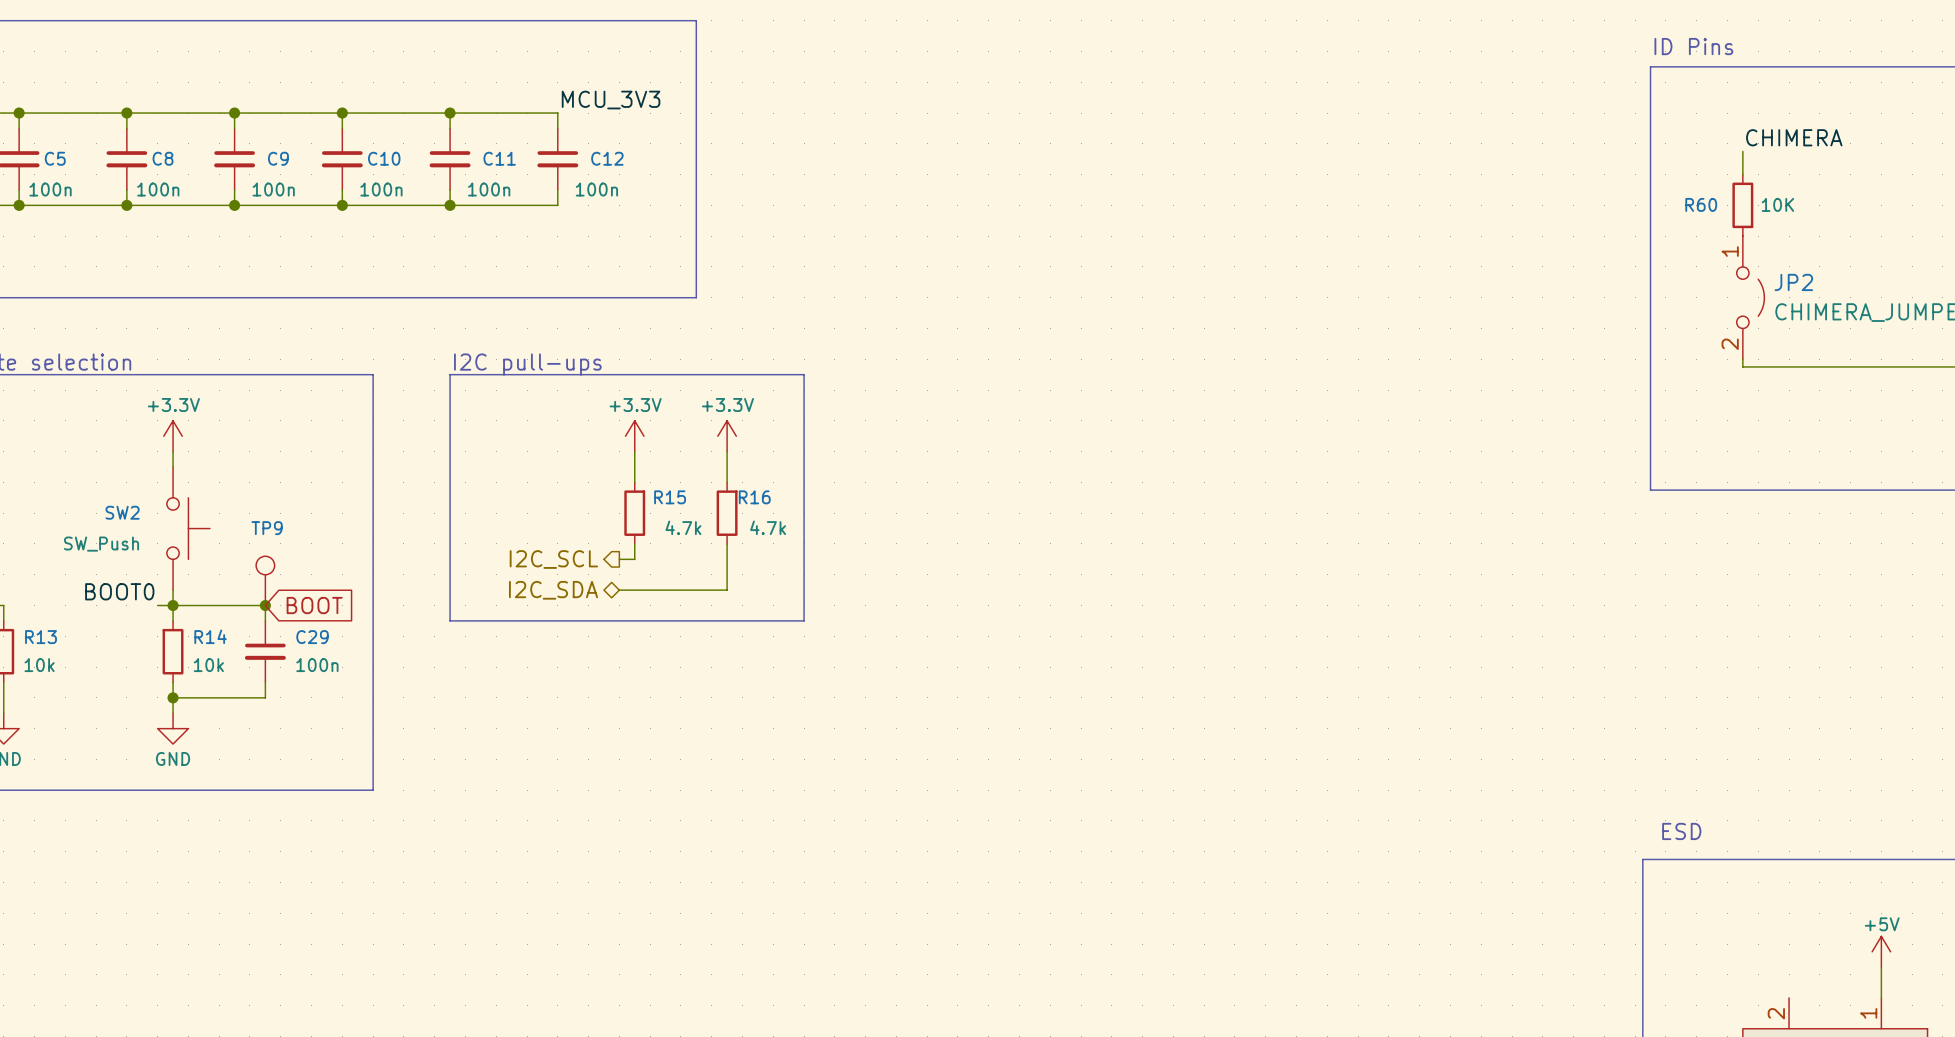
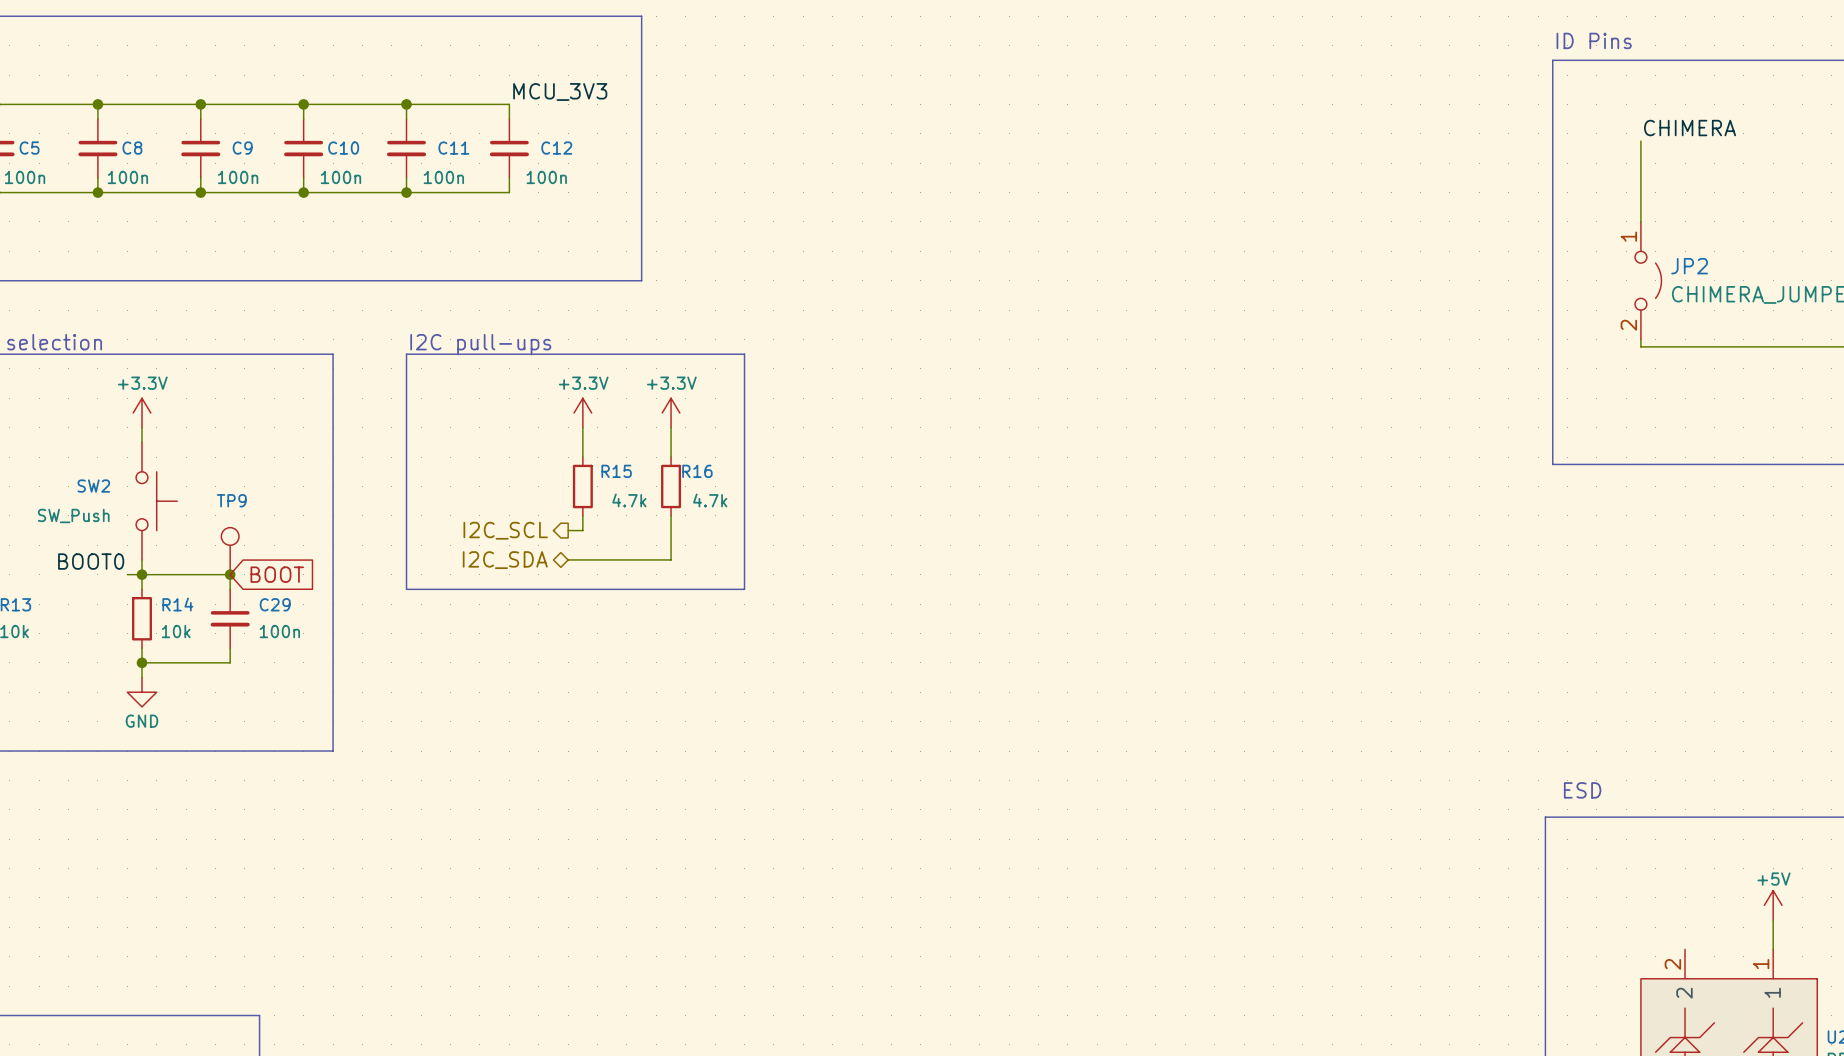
wire: none -> (1640, 163) (1640, 221)
R60: 10K (1742, 205) -> none

